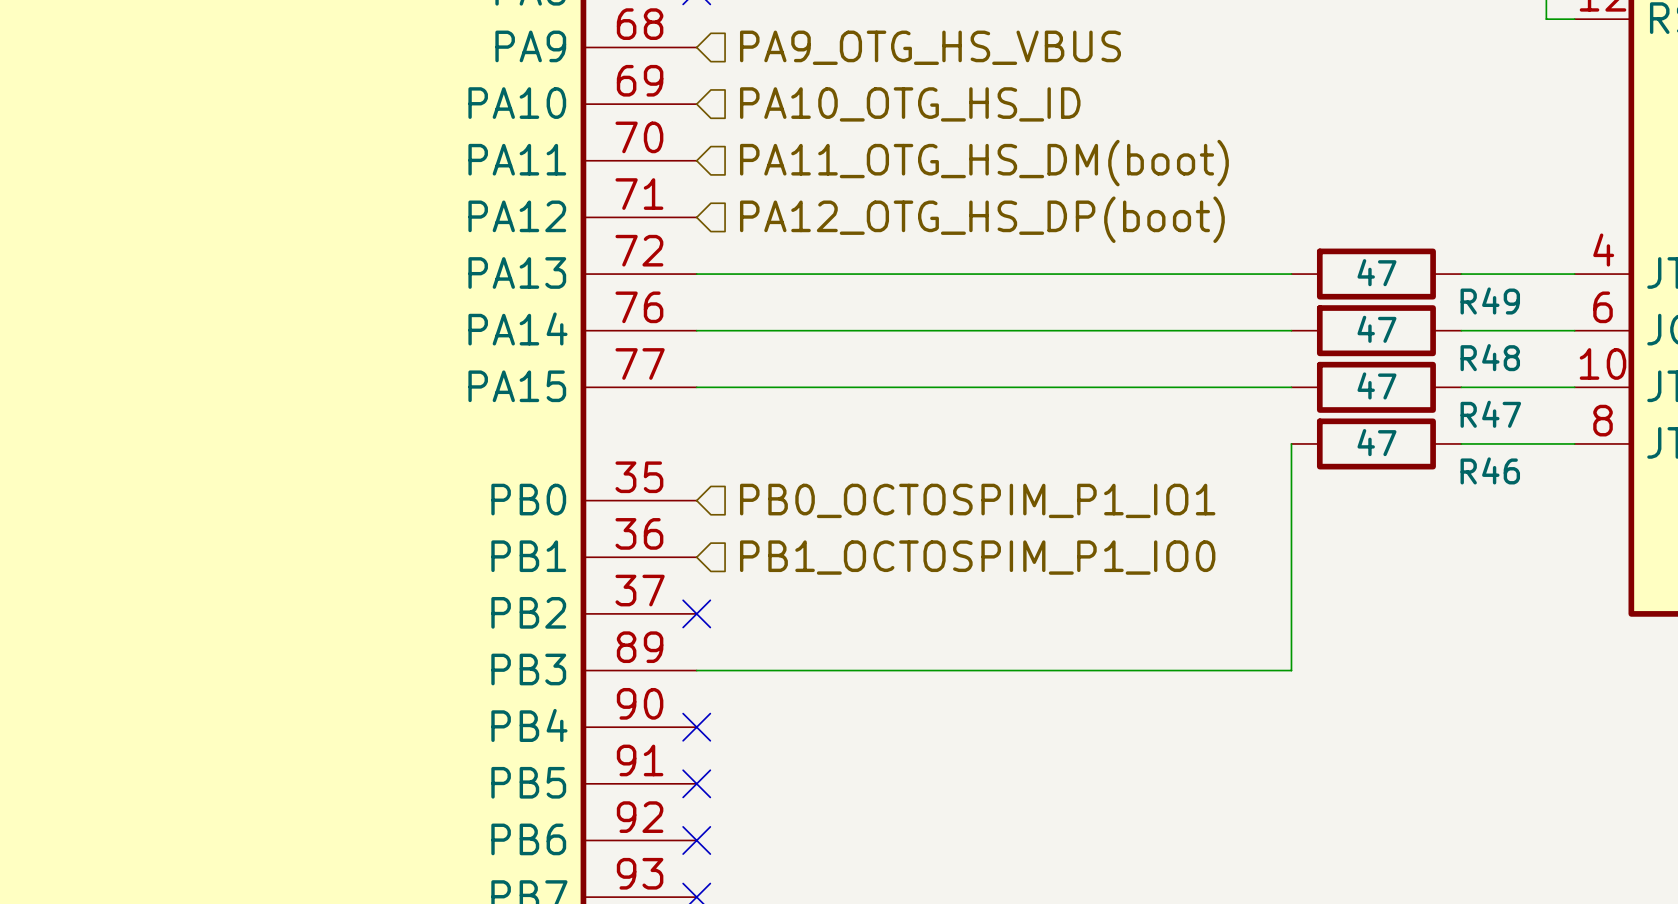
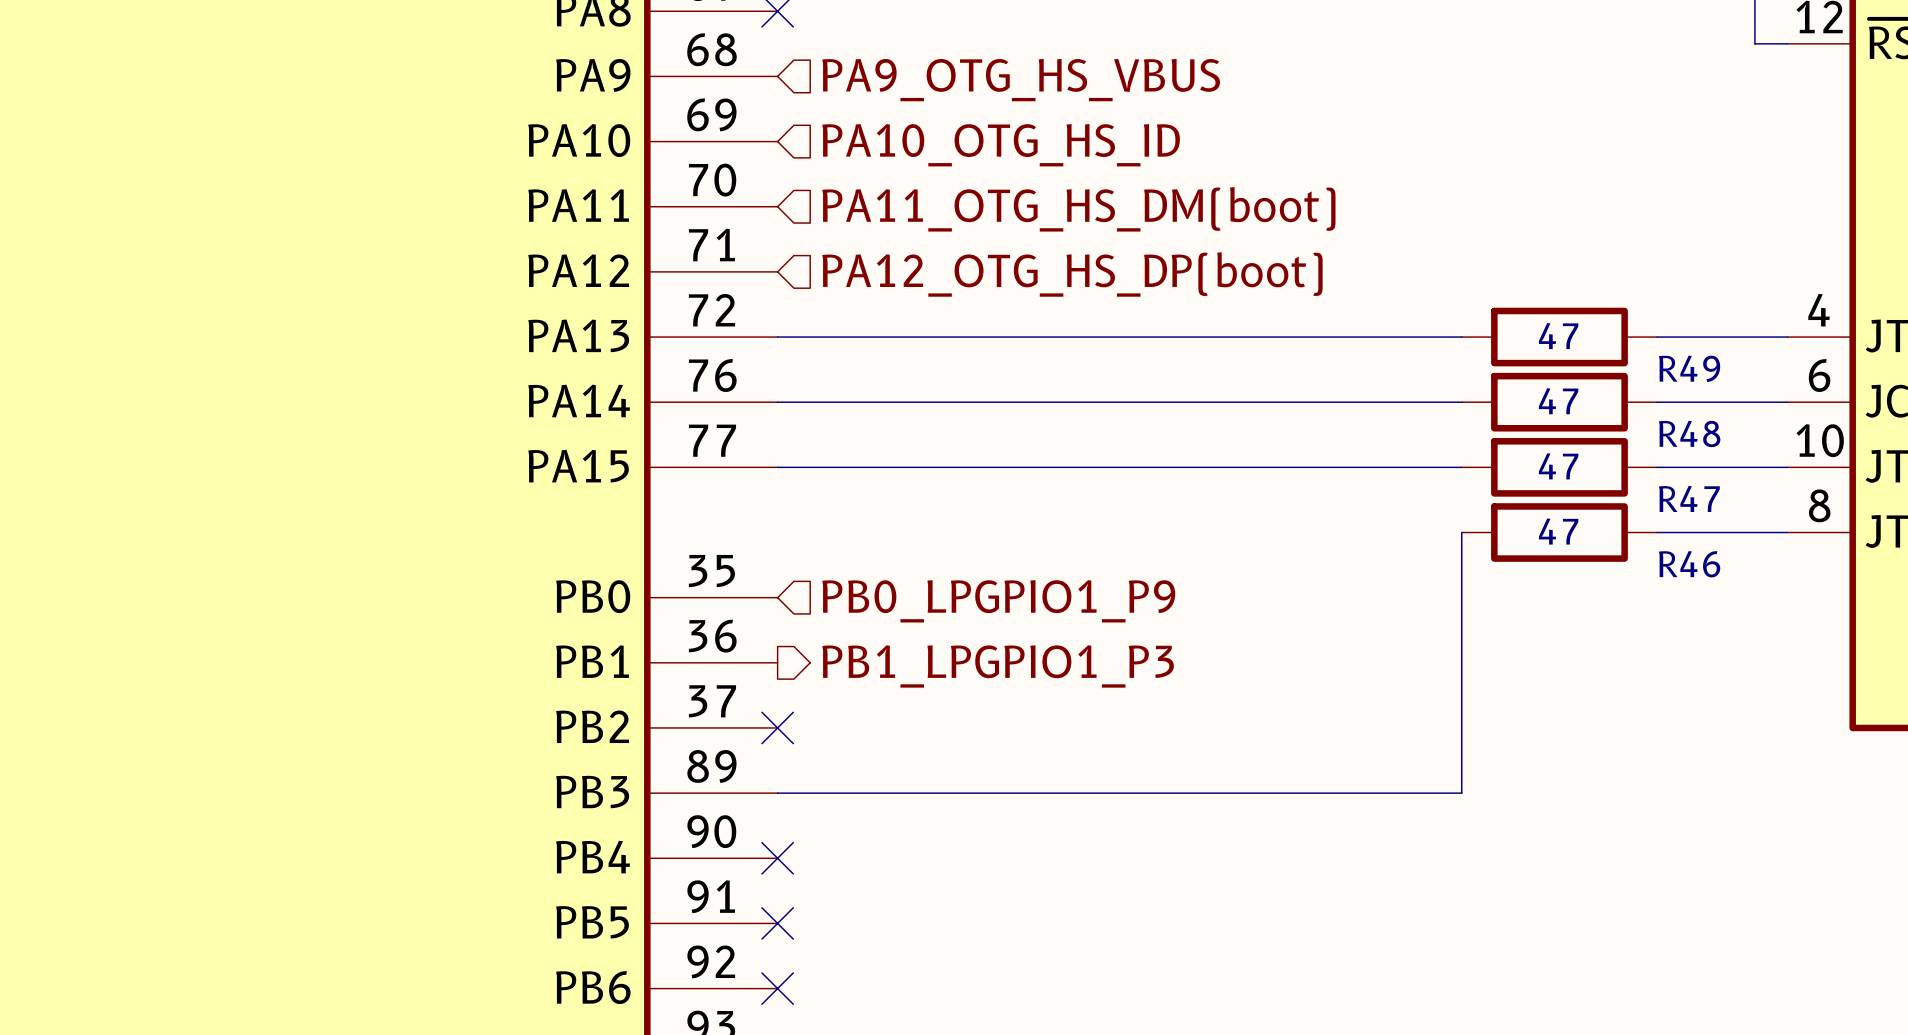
hierarchical label: PB0_OCTOSPIM_P1_IO1 (977, 500) -> PB0_LPGPIO1_P9 (998, 601)
hierarchical label shape: input (977, 557) -> output (998, 666)
hierarchical label: PB1_OCTOSPIM_P1_IO0 (977, 557) -> PB1_LPGPIO1_P3 (998, 666)

